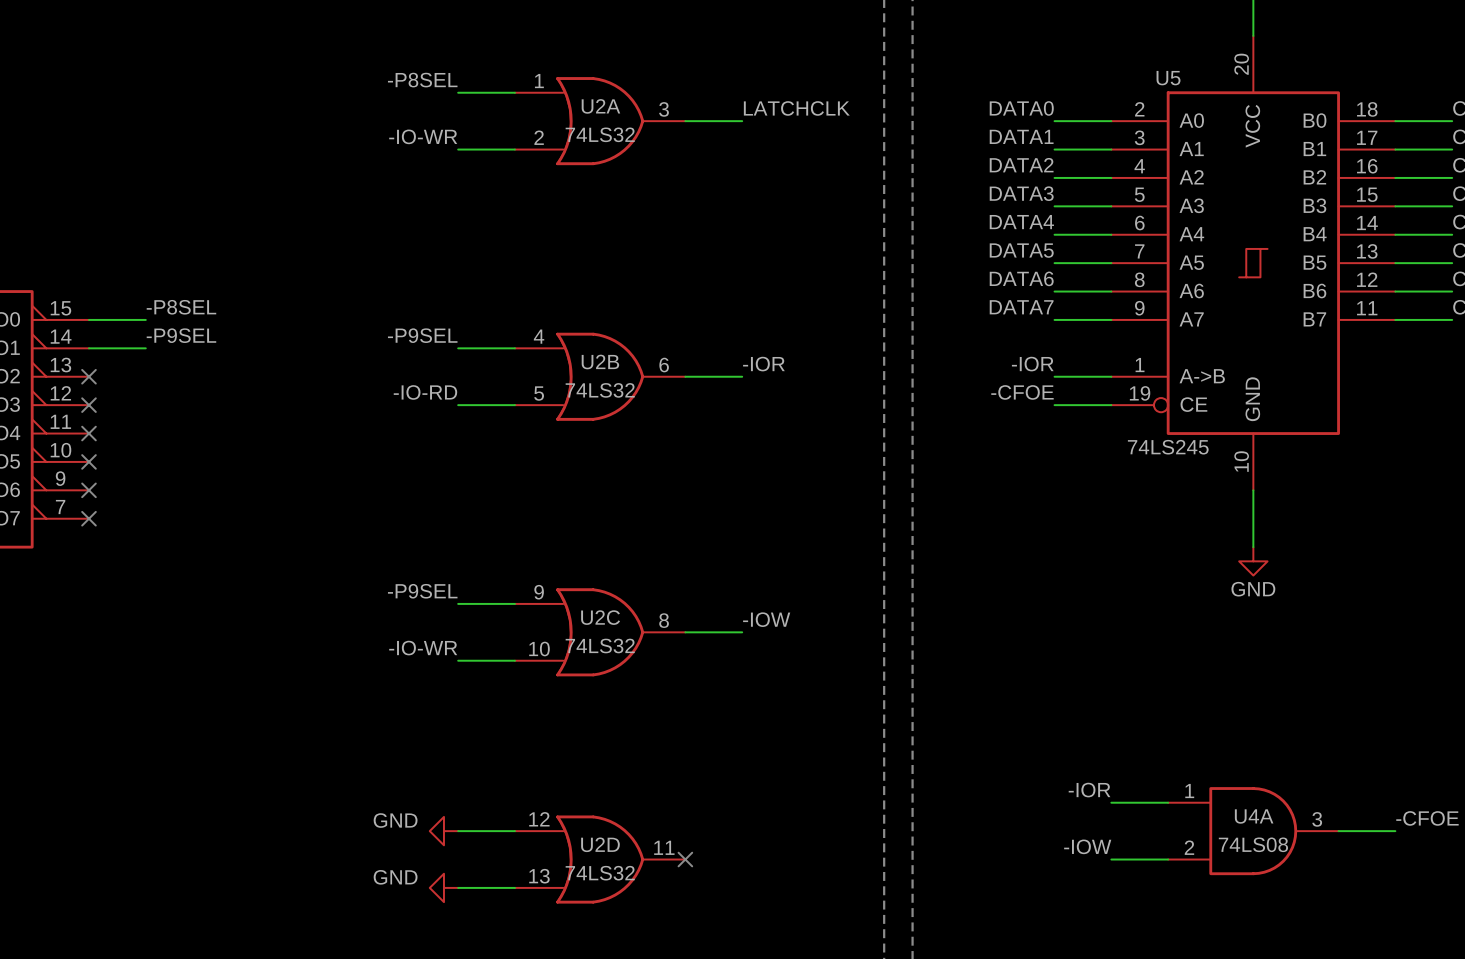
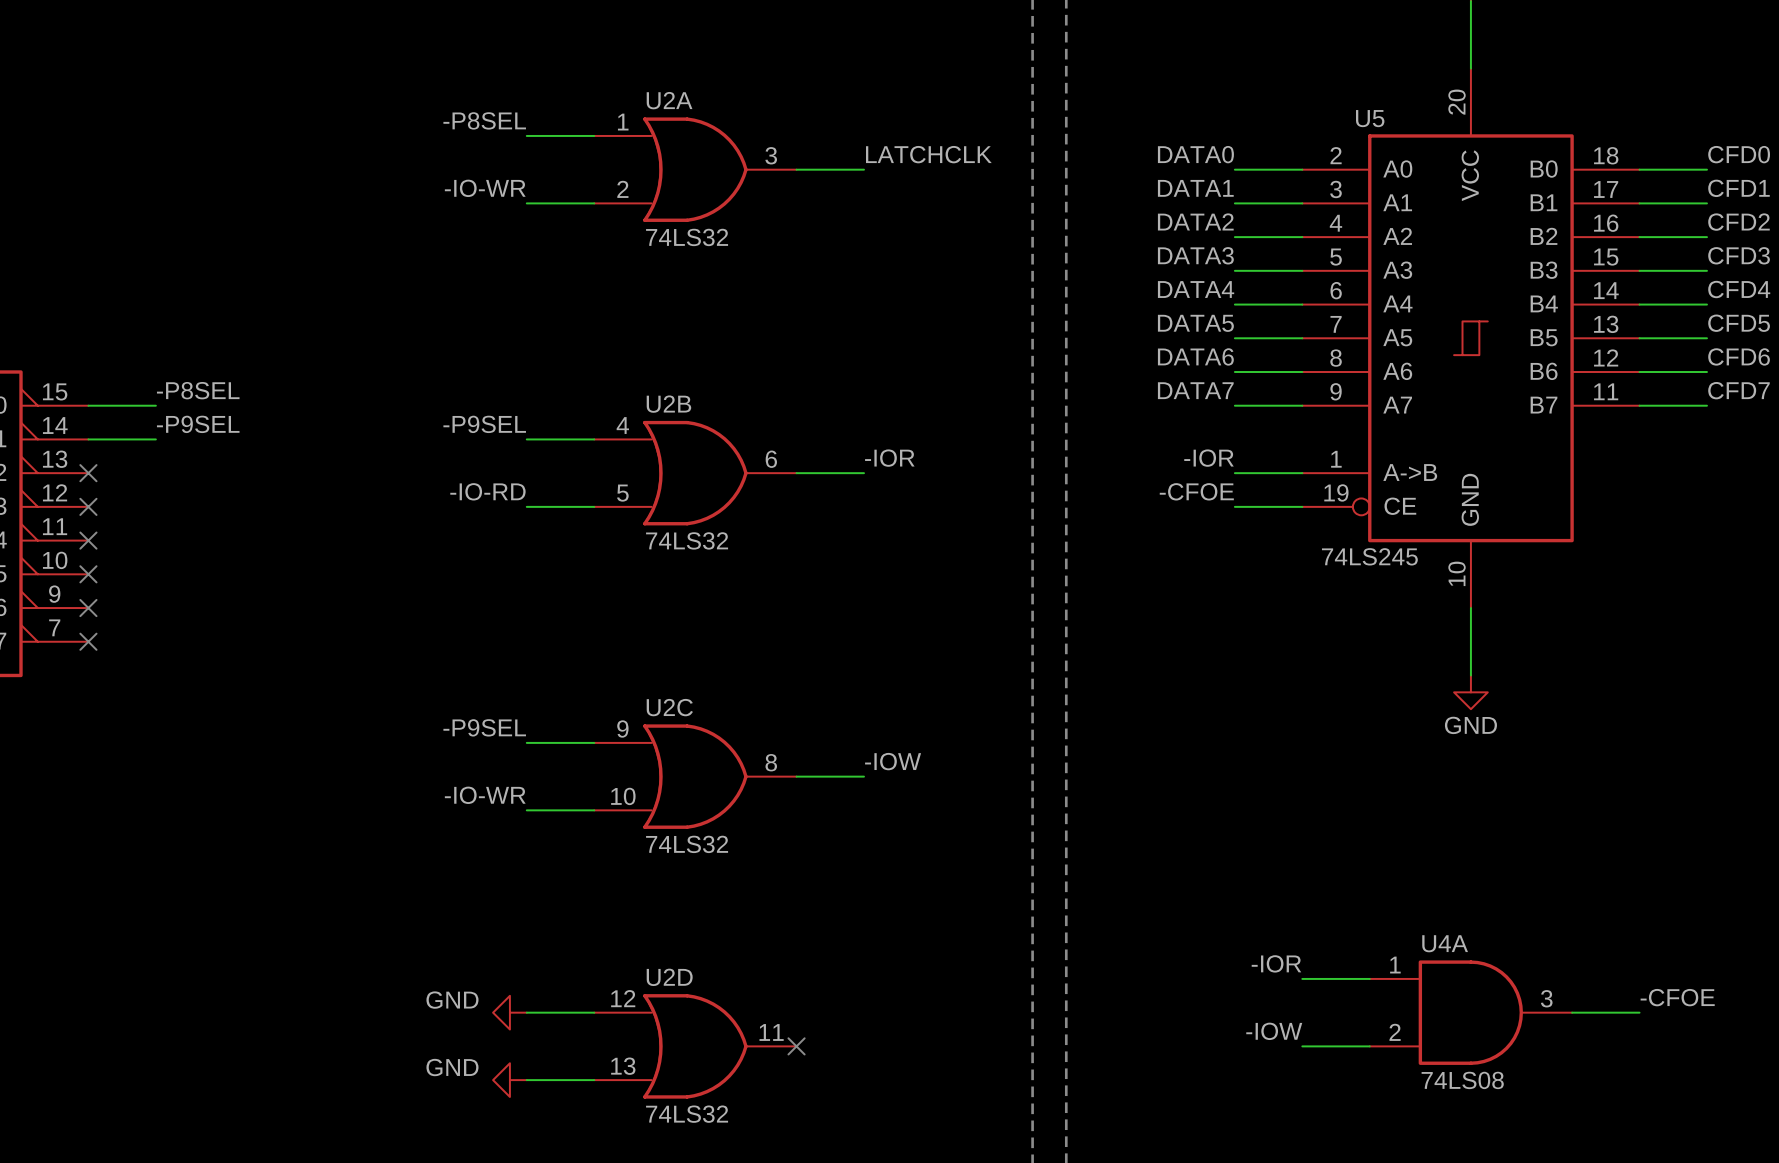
U2A name position: U2A (600, 106) -> U2A (669, 100)
U2A value position: 74LS32 (600, 134) -> 74LS32 (687, 237)
U2B name position: U2B (600, 362) -> U2B (668, 404)
U2B value position: 74LS32 (600, 390) -> 74LS32 (687, 540)
U2C name position: U2C (600, 617) -> U2C (669, 707)
U2C value position: 74LS32 (600, 645) -> 74LS32 (687, 844)
U4A name position: U4A (1254, 816) -> U4A (1445, 943)
U2D name position: U2D (600, 844) -> U2D (669, 977)
U4A value position: 74LS08 (1253, 844) -> 74LS08 (1462, 1080)
U2D value position: 74LS32 (600, 873) -> 74LS32 (687, 1114)

